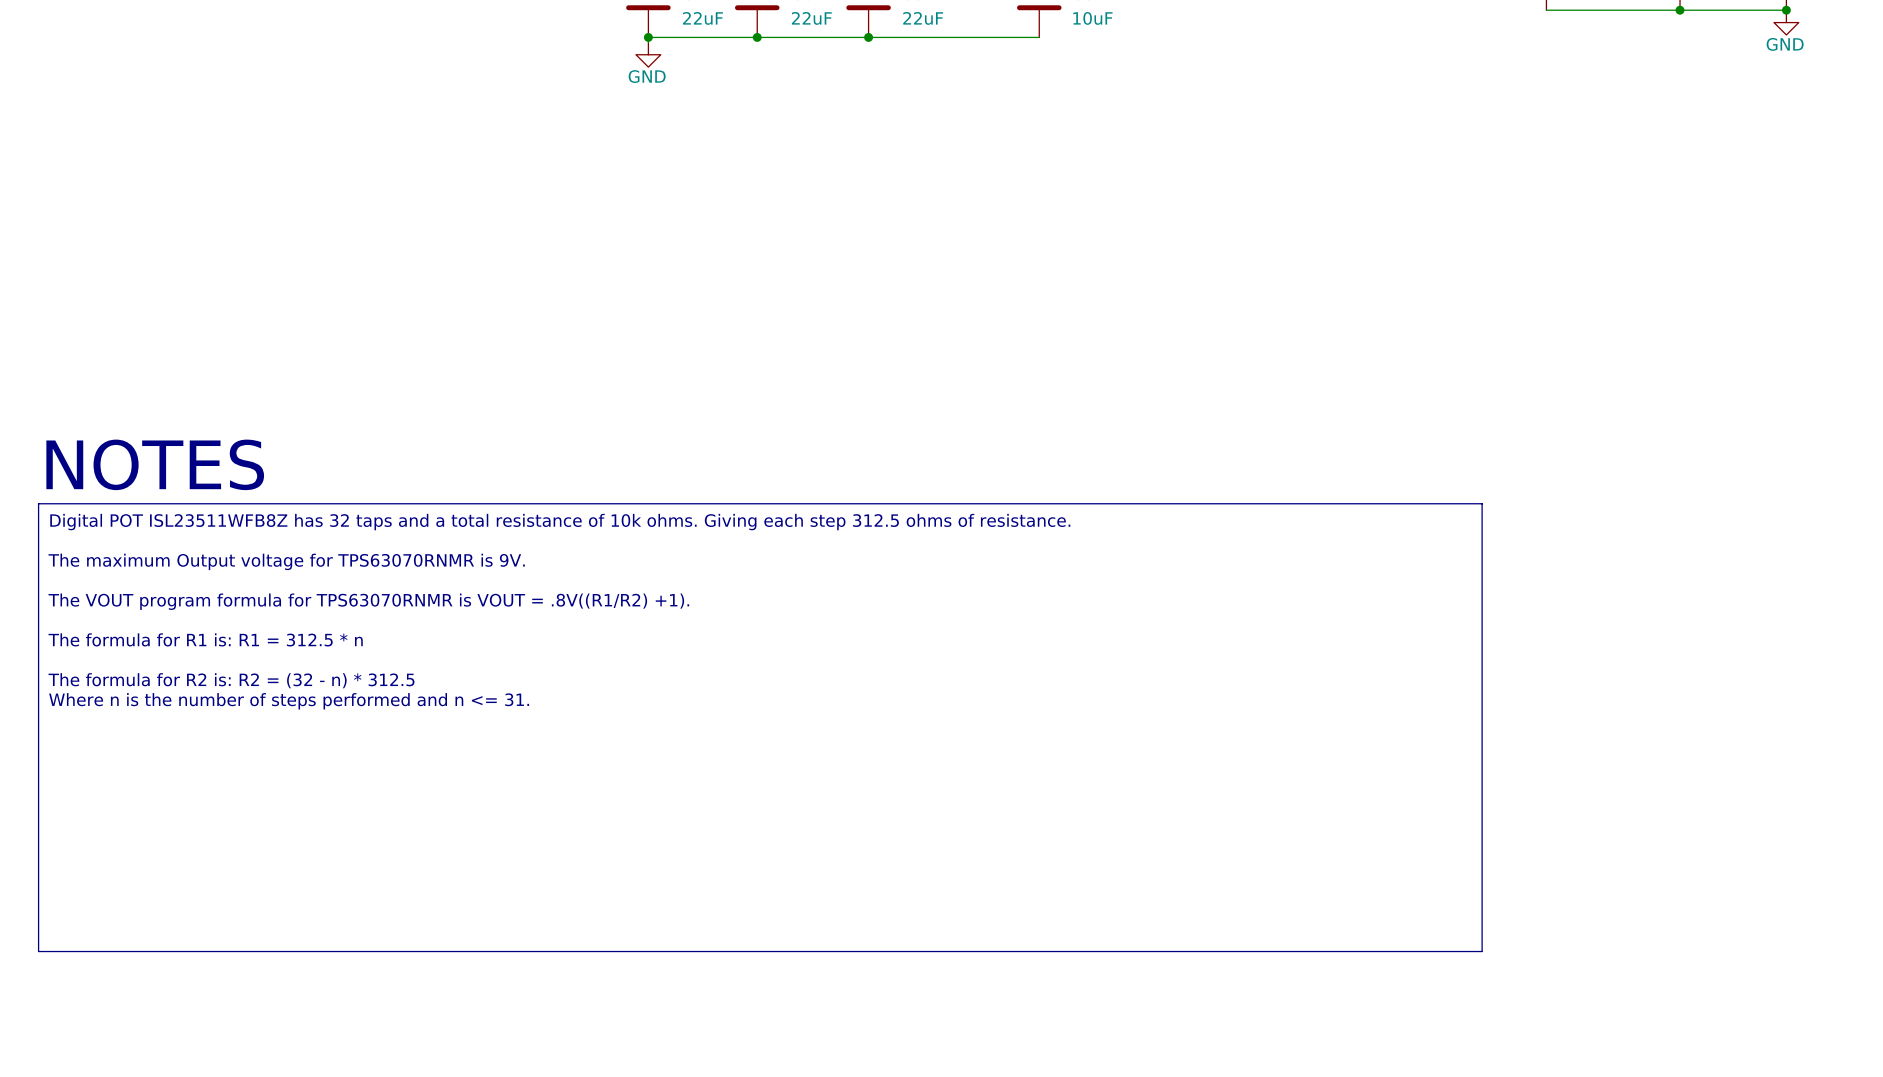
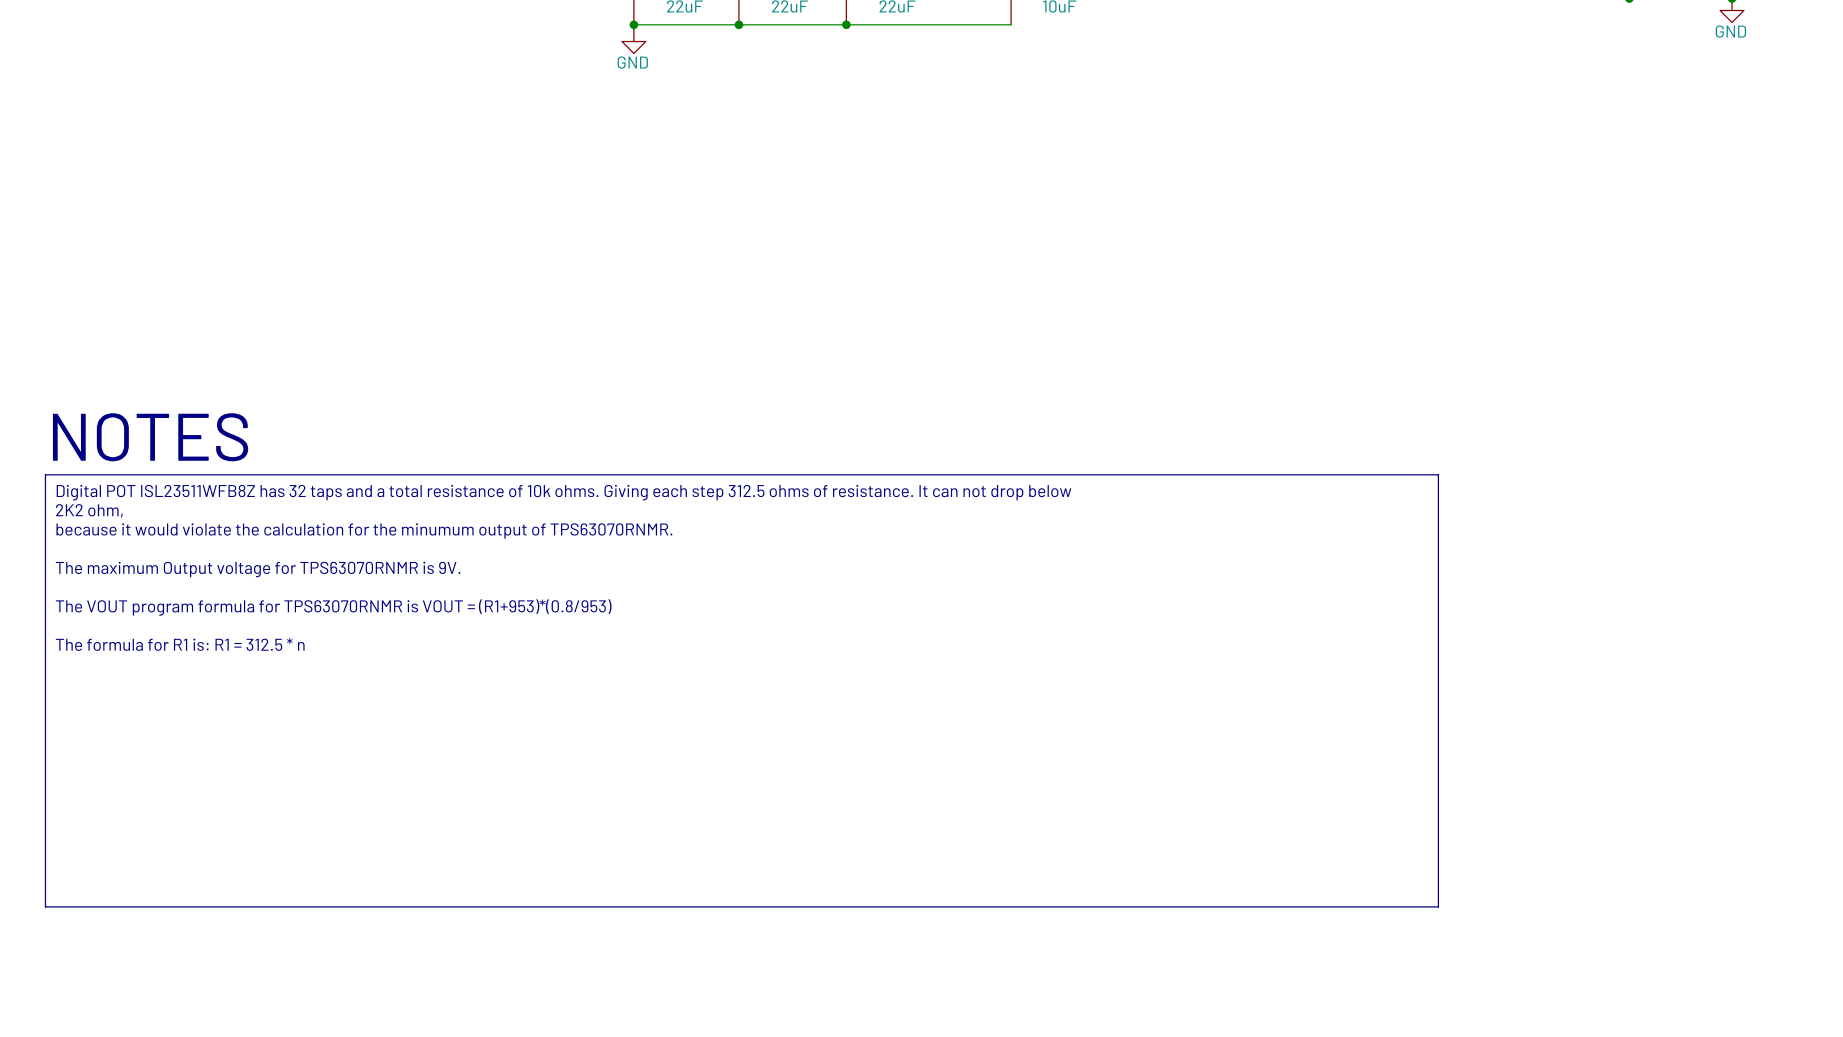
text: Digital POT ISL23511WFB8Z has 32 taps and a total resistance of 10k ohms. Giving each step 312.5 ohms of resistance. (560, 522) -> Digital POT ISL23511WFB8Z has 32 taps and a total resistance of 10k ohms. Giving each step 312.5 ohms of resistance. It can not drop below (563, 492)
text: none -> 2K2 ohm, (89, 510)
text: The maximum Output voltage for TPS63070RNMR is 9V. (286, 561) -> because it would violate the calculation for the minumum output of TPS63070RNMR. (364, 531)
text: The VOUT program formula for TPS63070RNMR is VOUT = .8V((R1/R2) +1). (368, 601) -> The maximum Output voltage for TPS63070RNMR is 9V. (258, 569)
text: The formula for R1 is: R1 = 312.5 * n (205, 639) -> The VOUT program formula for TPS63070RNMR is VOUT = (R1+953)*(0.8/953) (333, 607)
text: The formula for R2 is: R2 = (32 - n) * 312.5 (231, 680) -> The formula for R1 is: R1 = 312.5 * n (180, 644)
text: Where n is the number of steps performed and n <= 31. (289, 701) -> none

